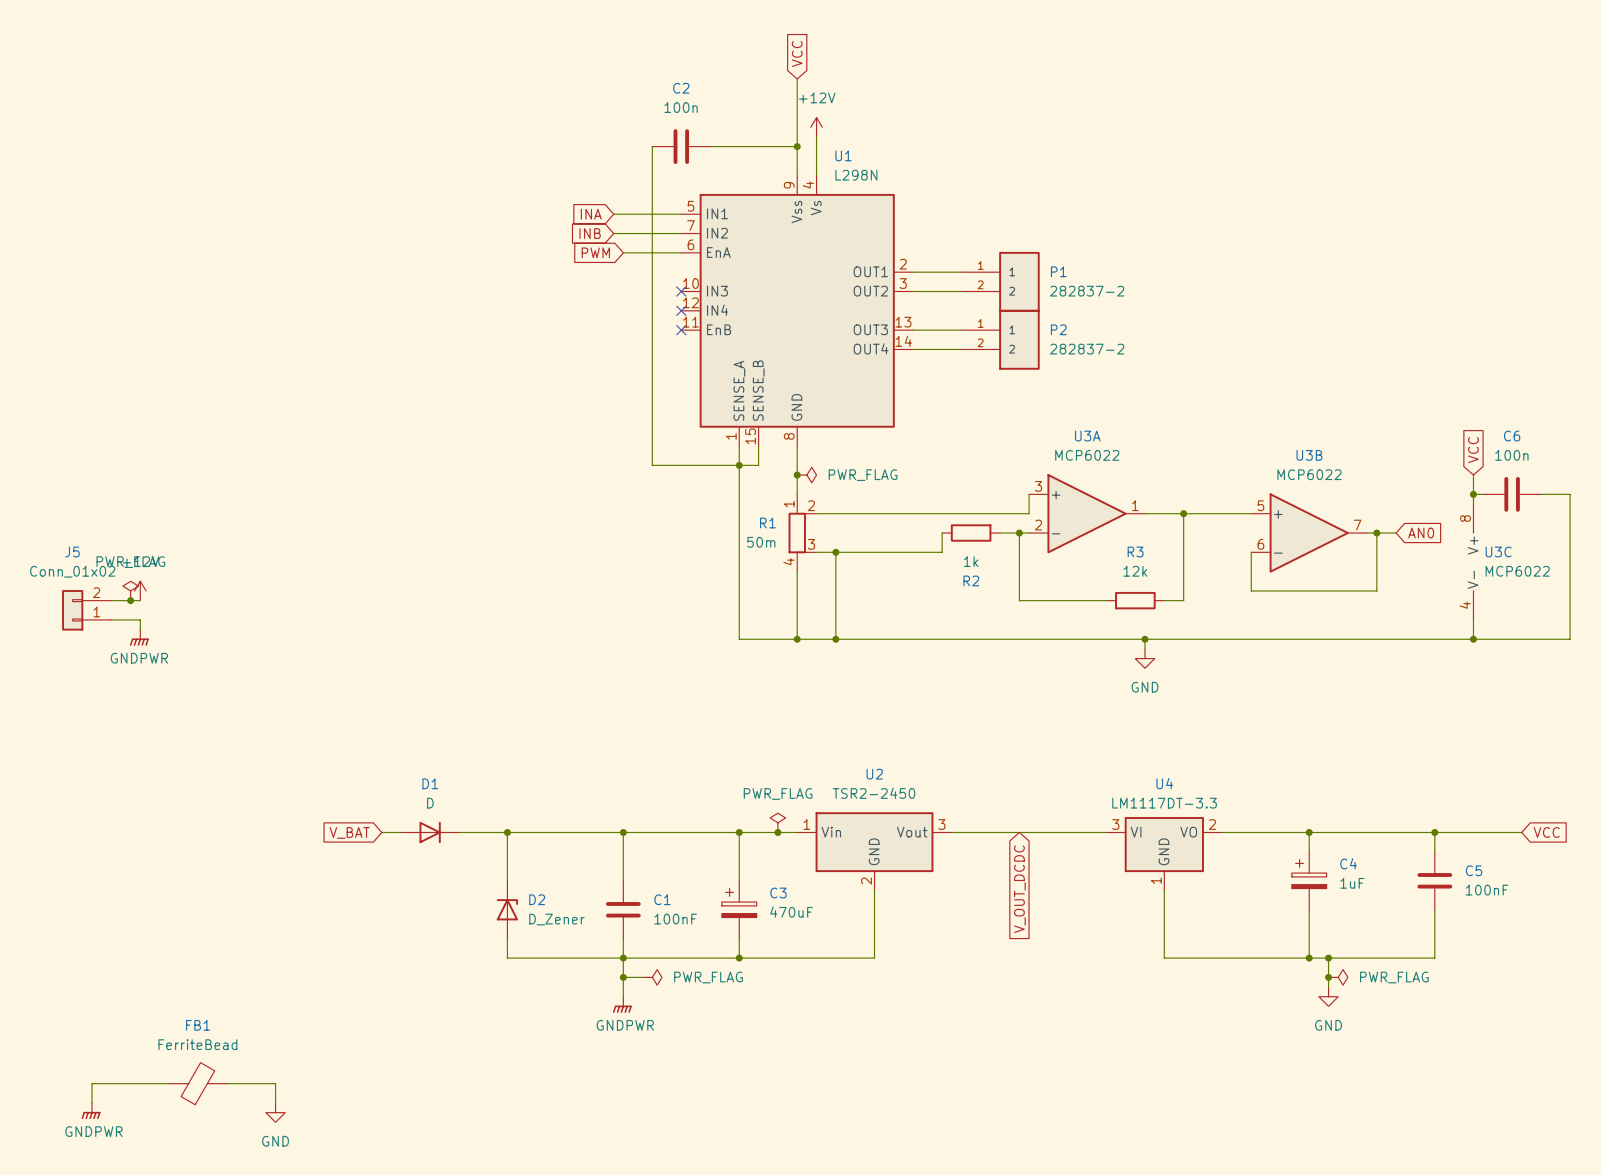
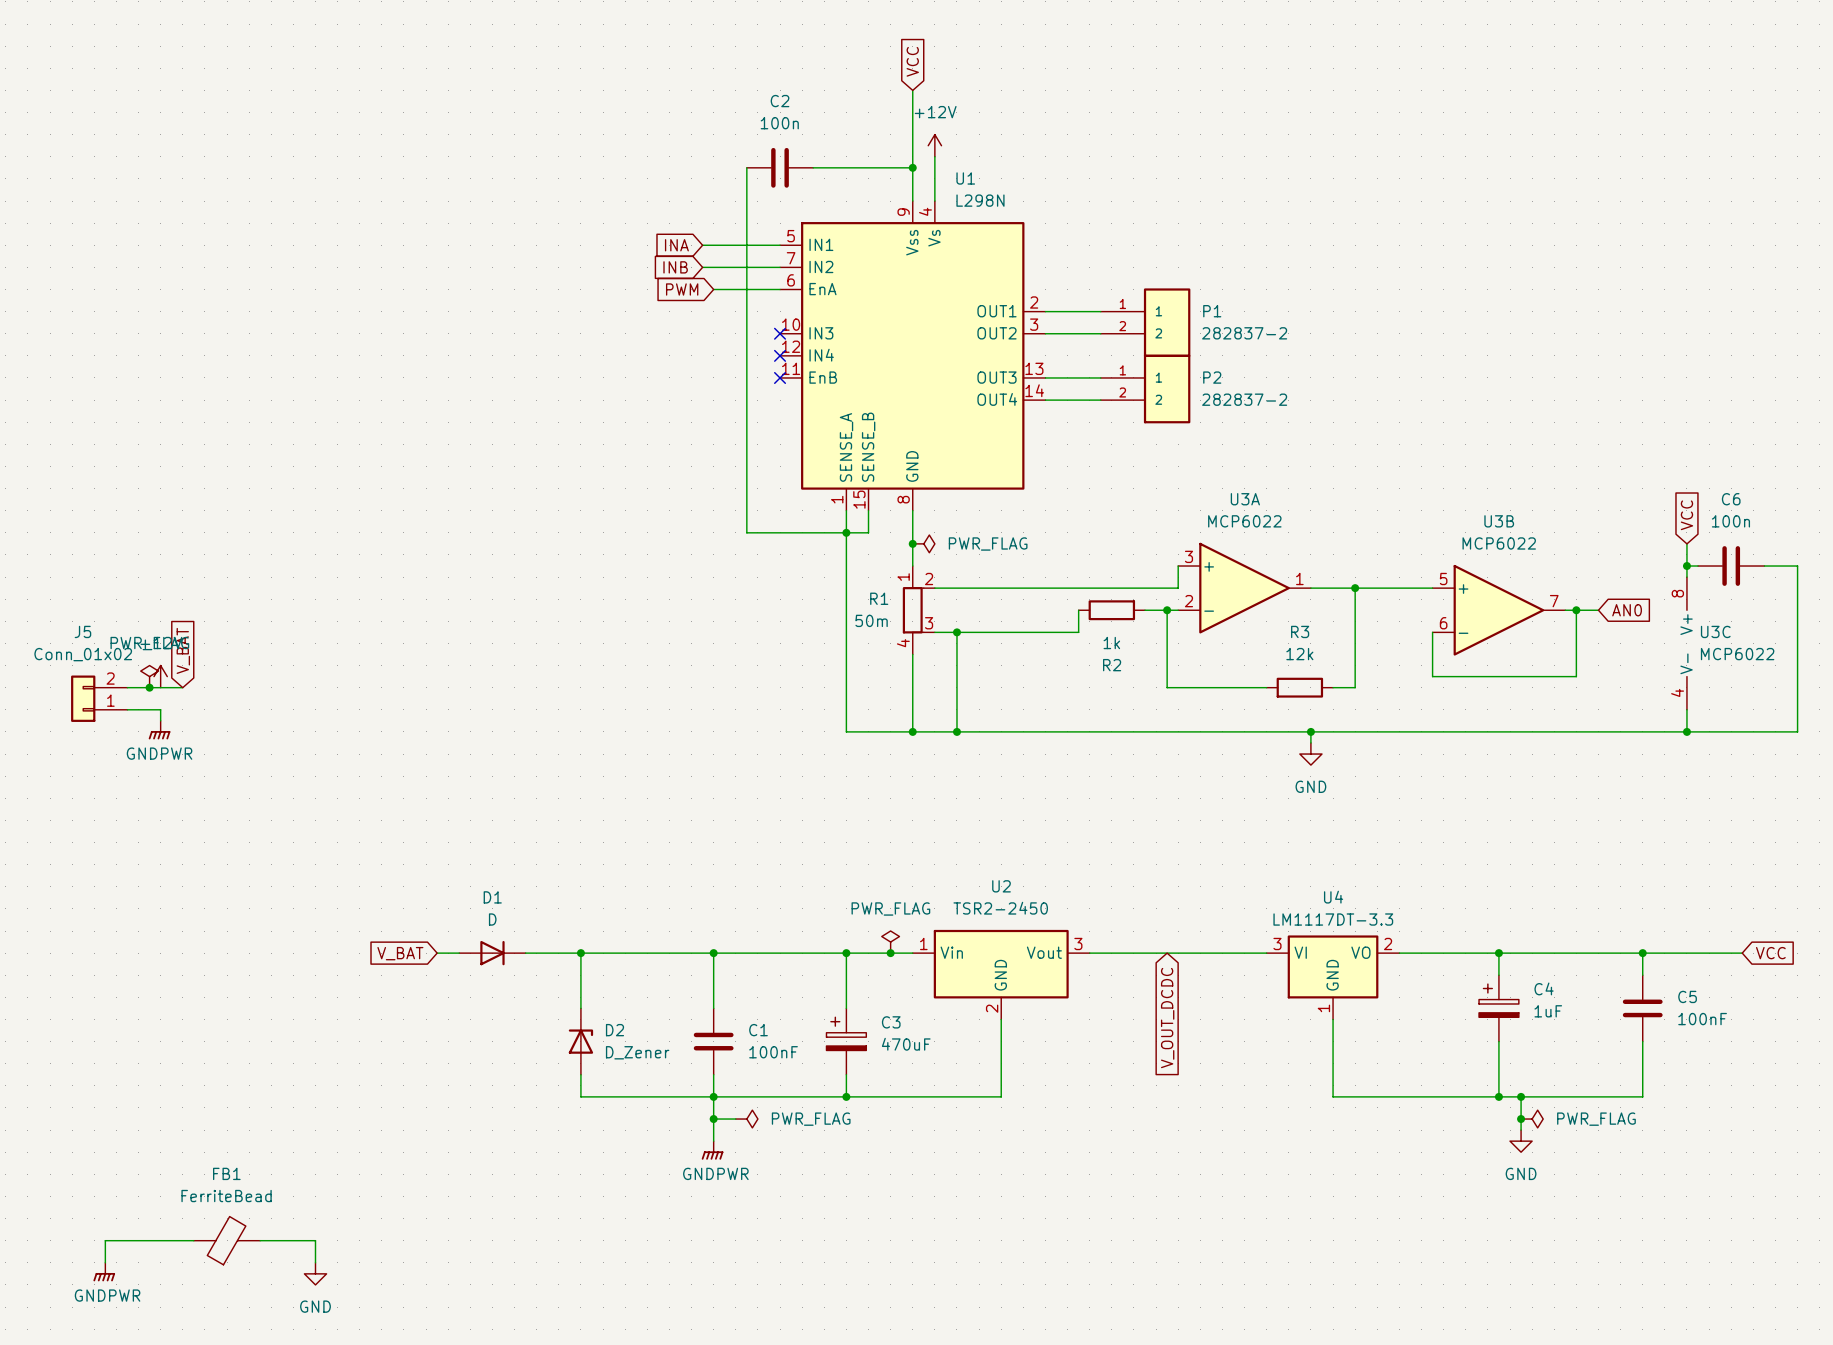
global label: none -> V_BAT (183, 650)
wire: none -> (160, 687) (182, 687)

